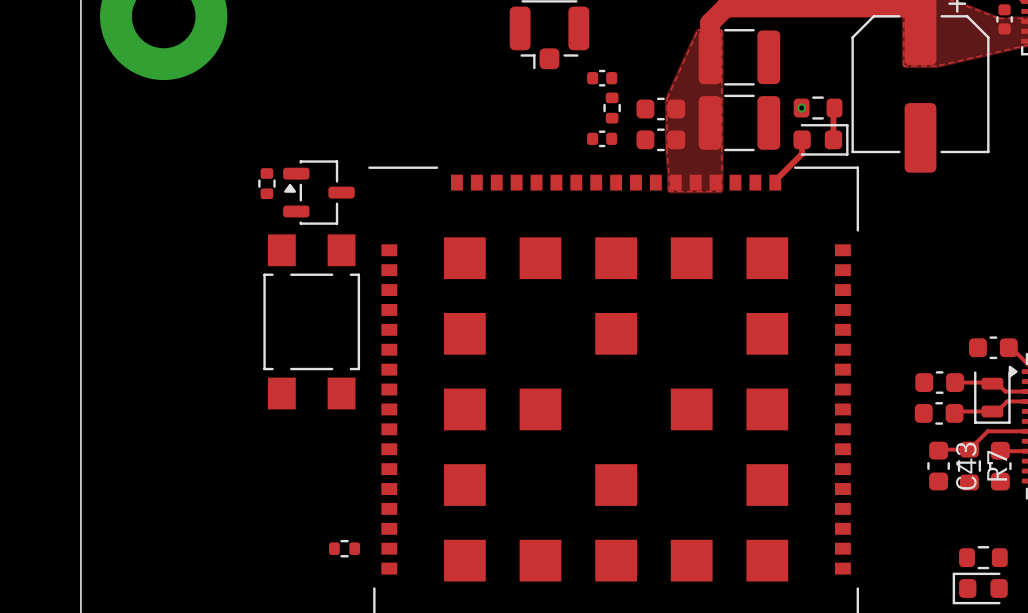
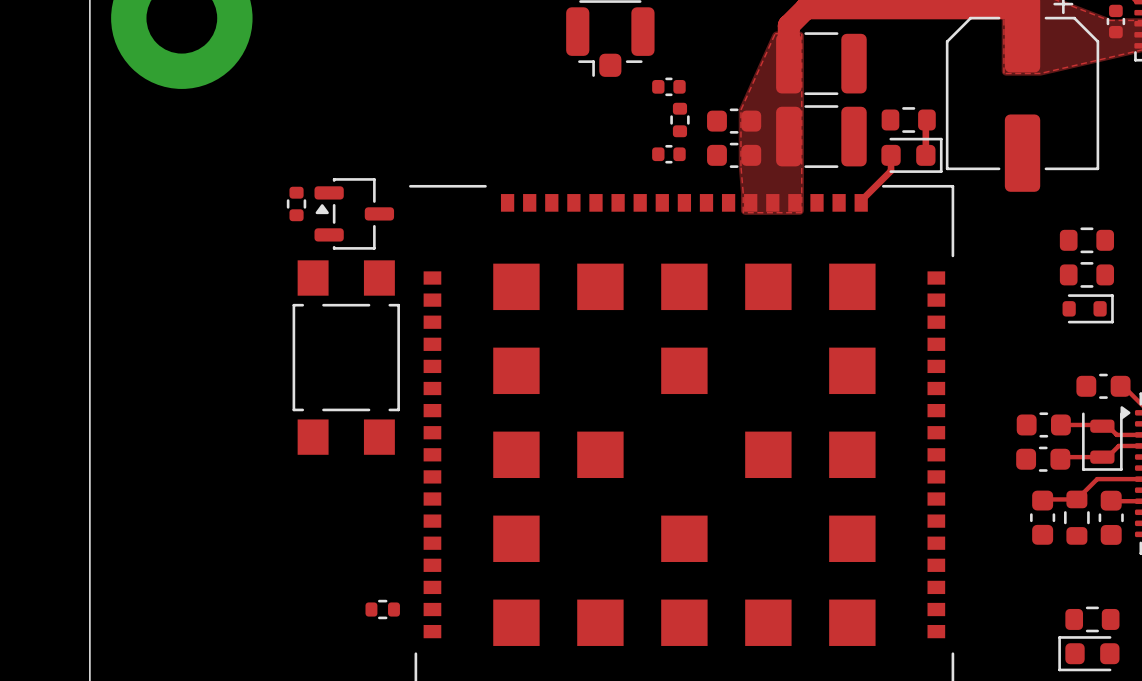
via: (801, 108) -> none
part: none -> (1086, 240)
part: none -> (1086, 274)
part: none -> (1088, 308)
R7 name: R7 (997, 465) -> none
C43 name: C43 (966, 466) -> none

